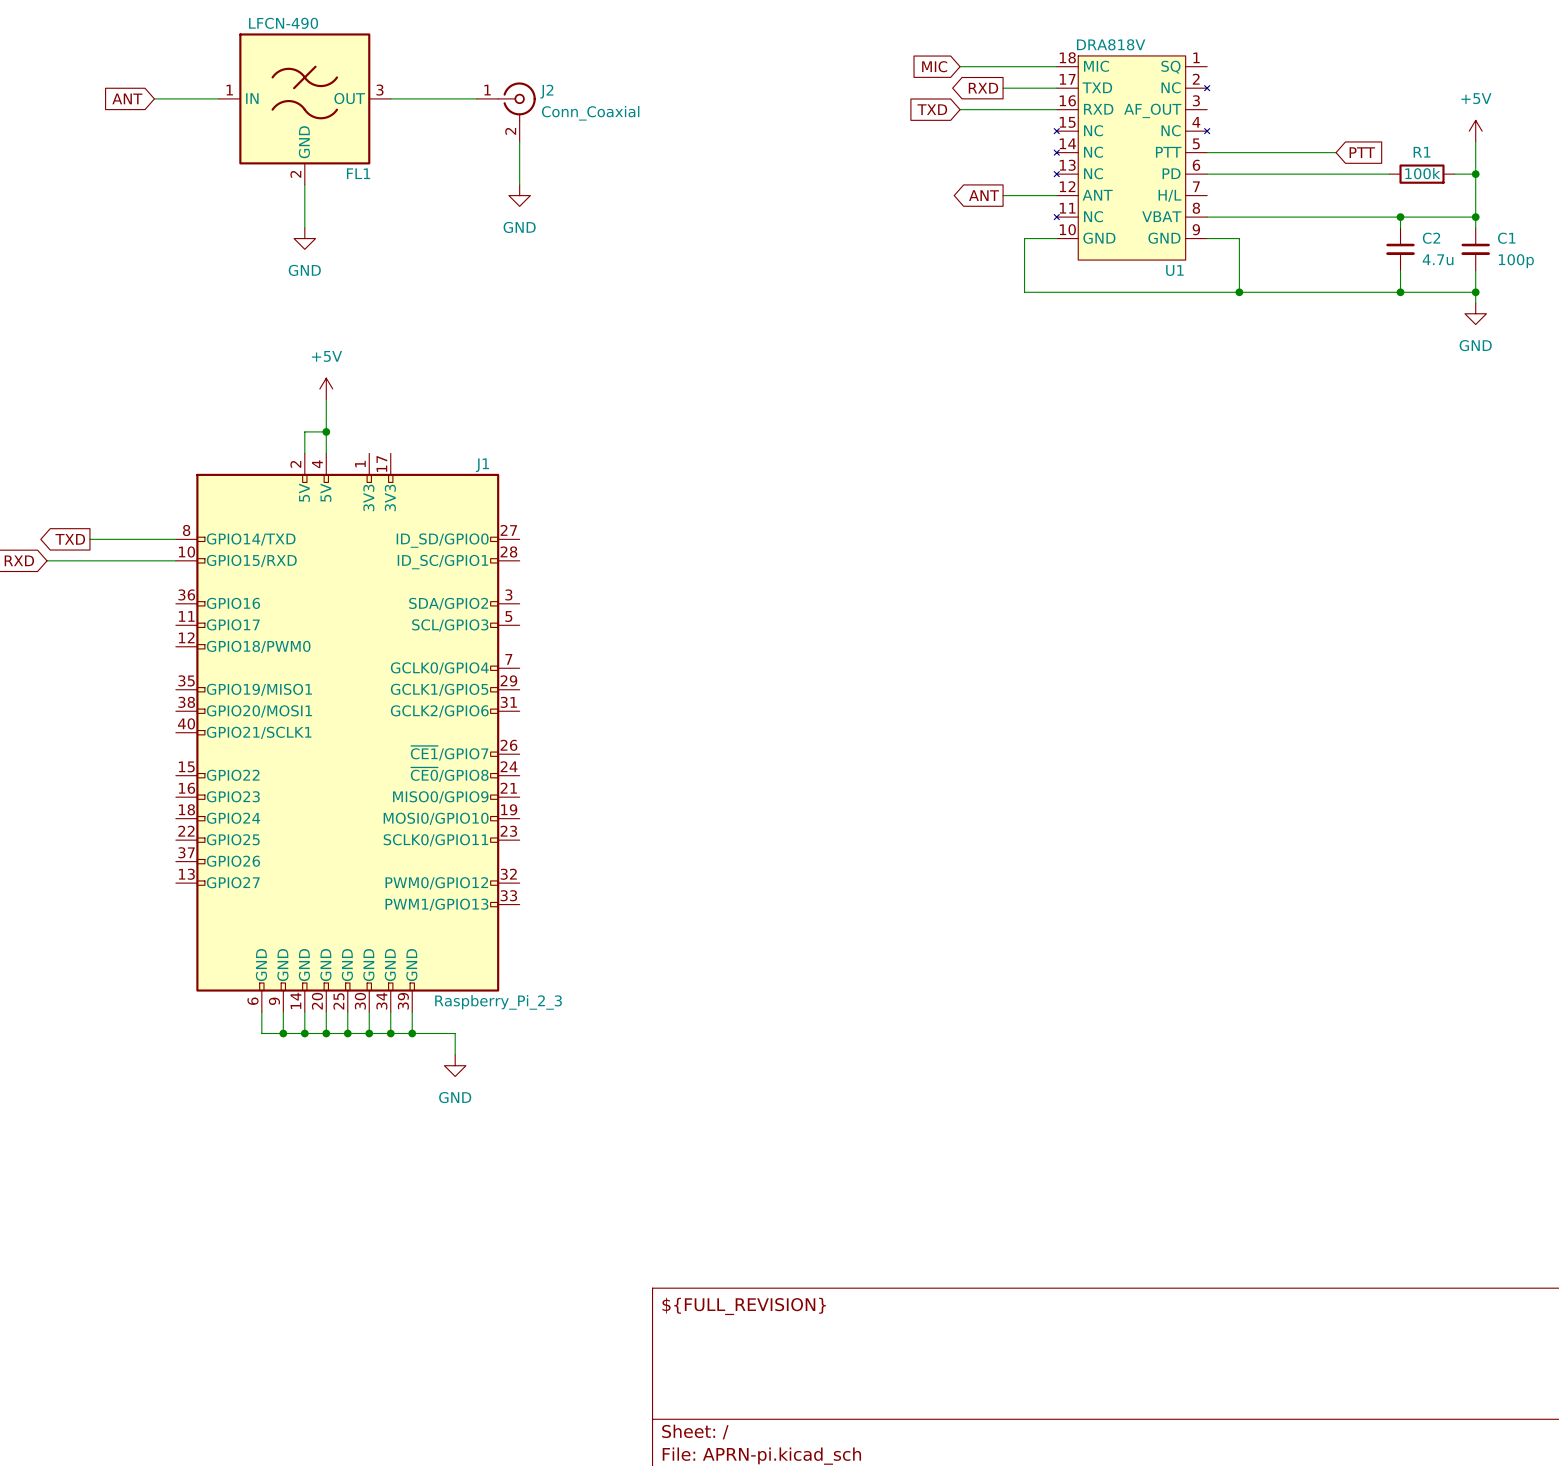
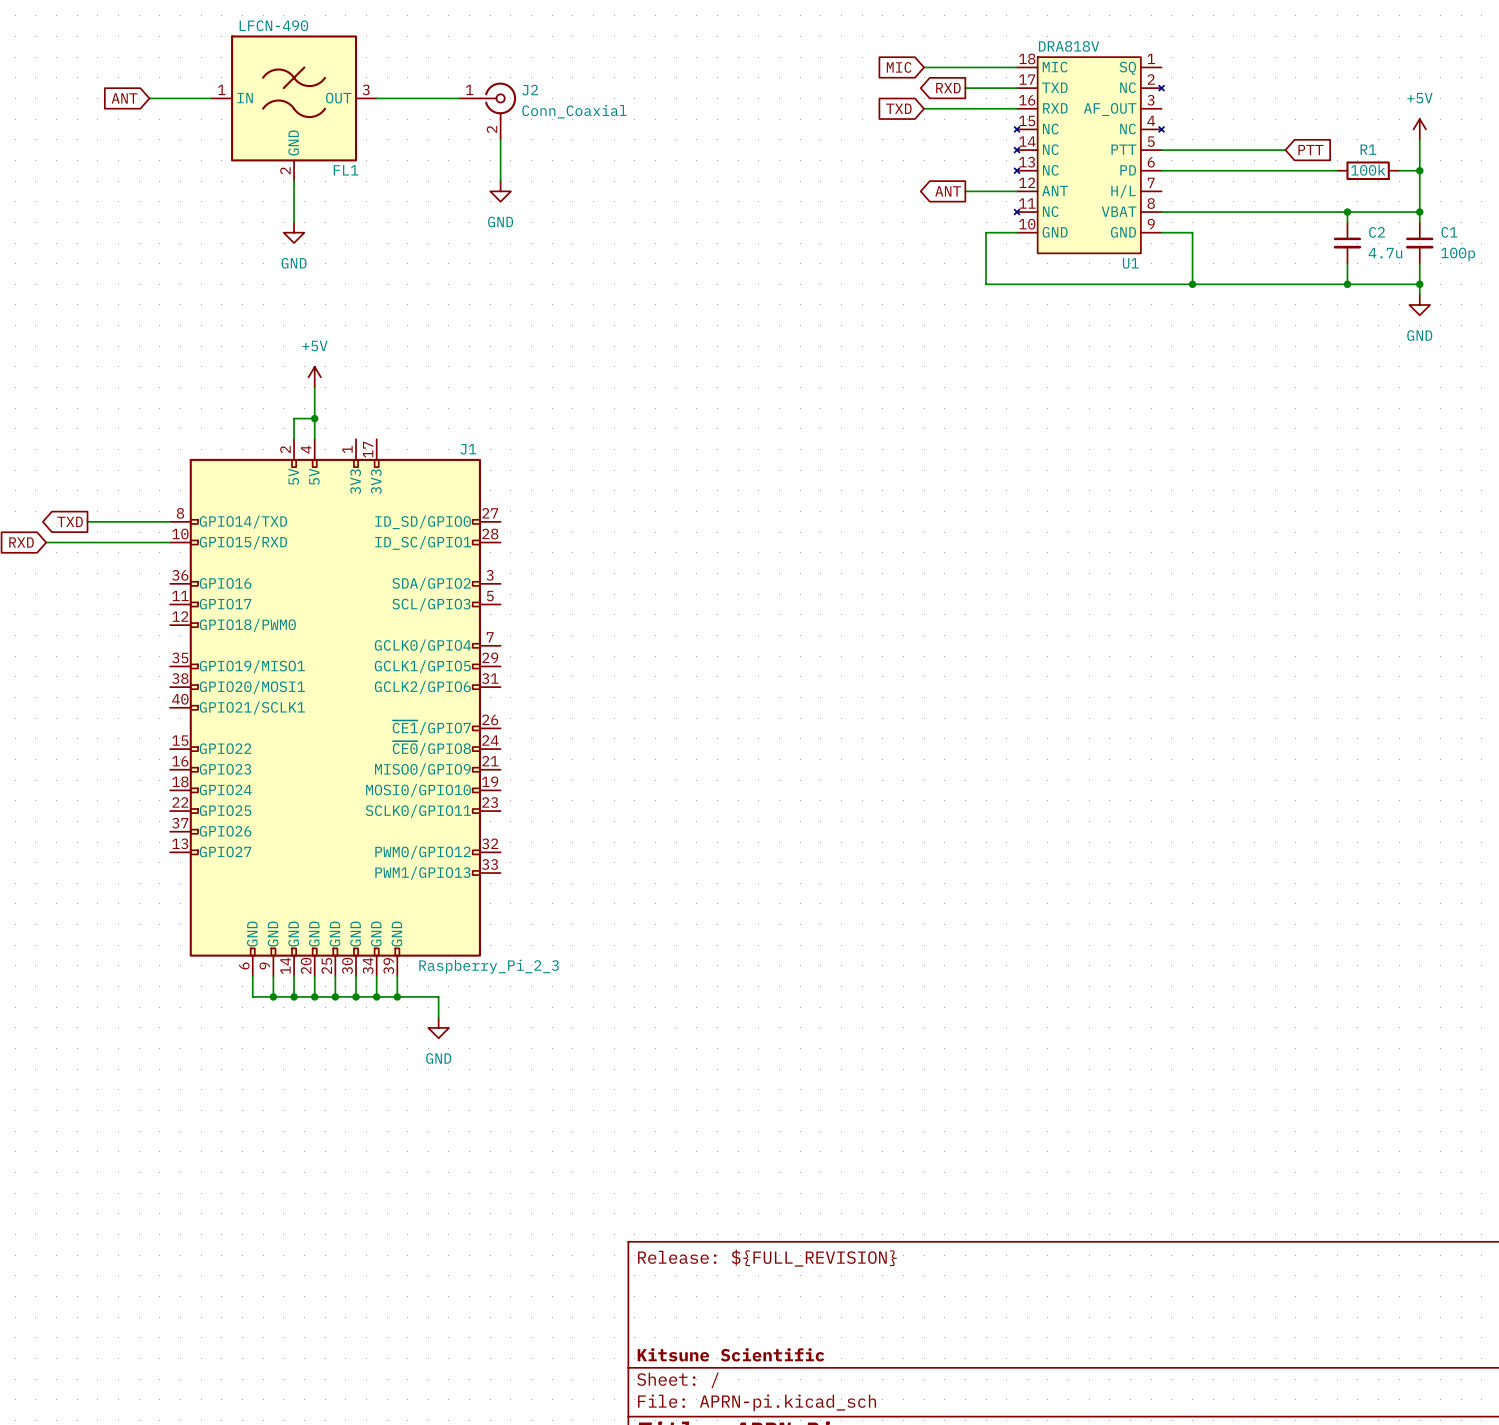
title block: ${FULL_REVISION} (744, 1306) -> Release: ${FULL_REVISION} (767, 1258)
title block: none -> Kitsune Scientific (730, 1354)

